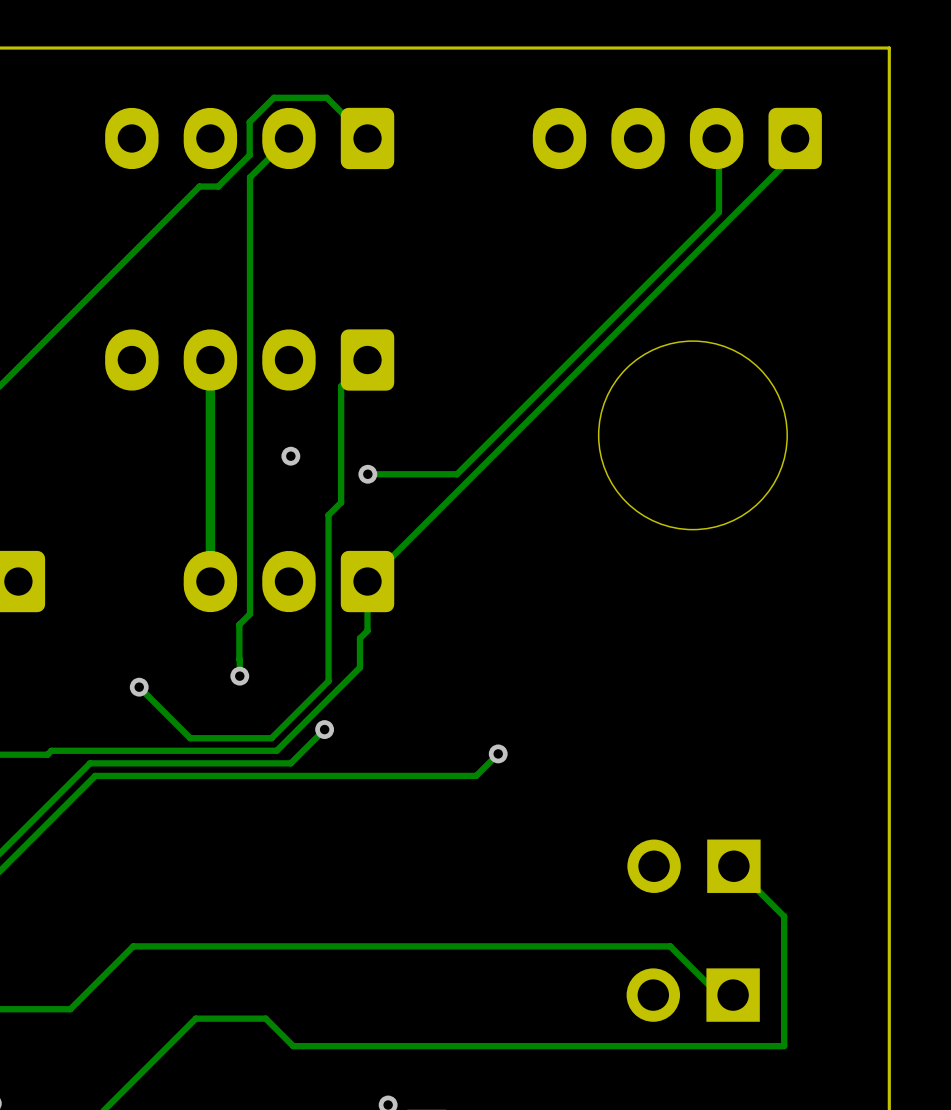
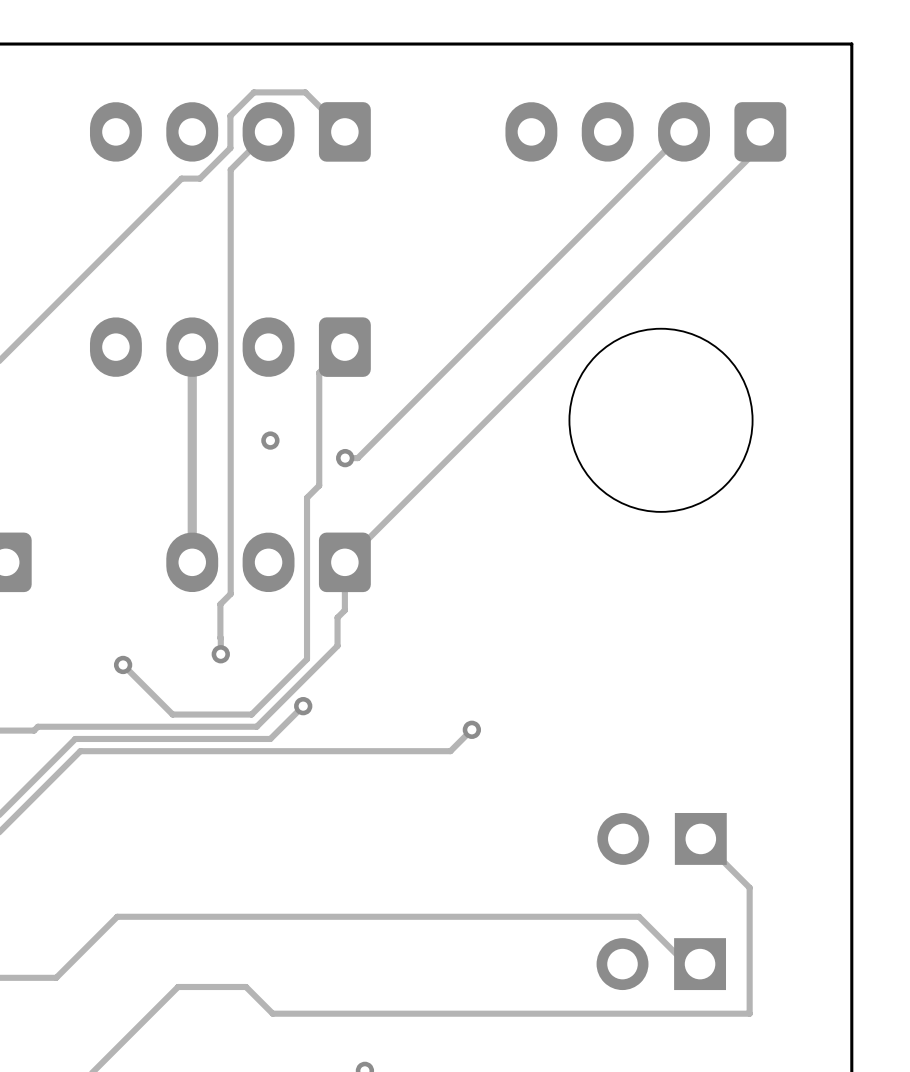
track: (716, 138) (718, 140) (718, 212) (457, 474) (380, 474) -> (684, 131) (357, 458)

